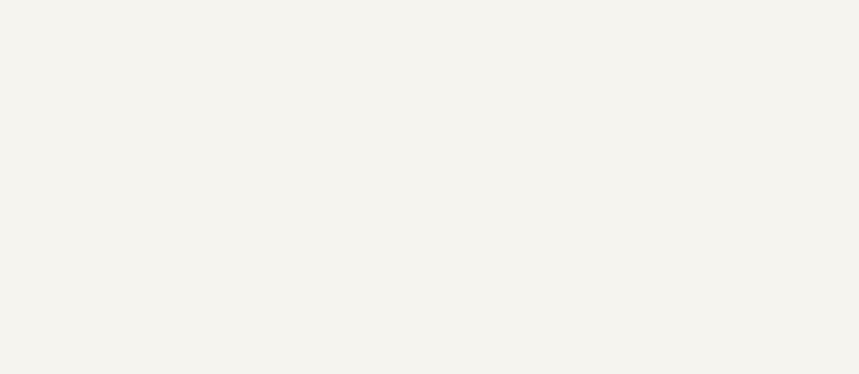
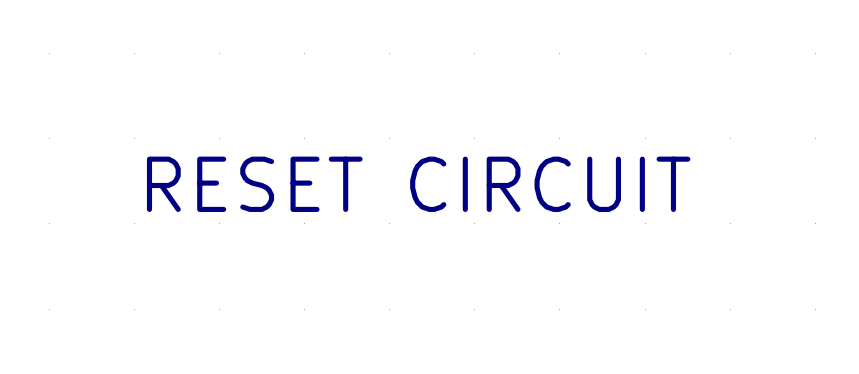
text: none -> RESET CIRCUIT (418, 184)

